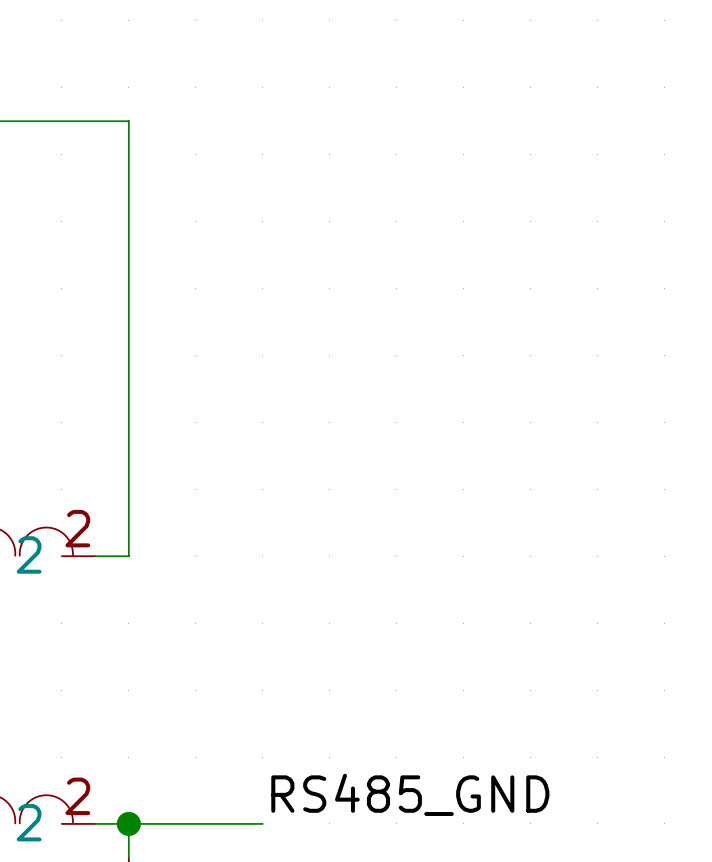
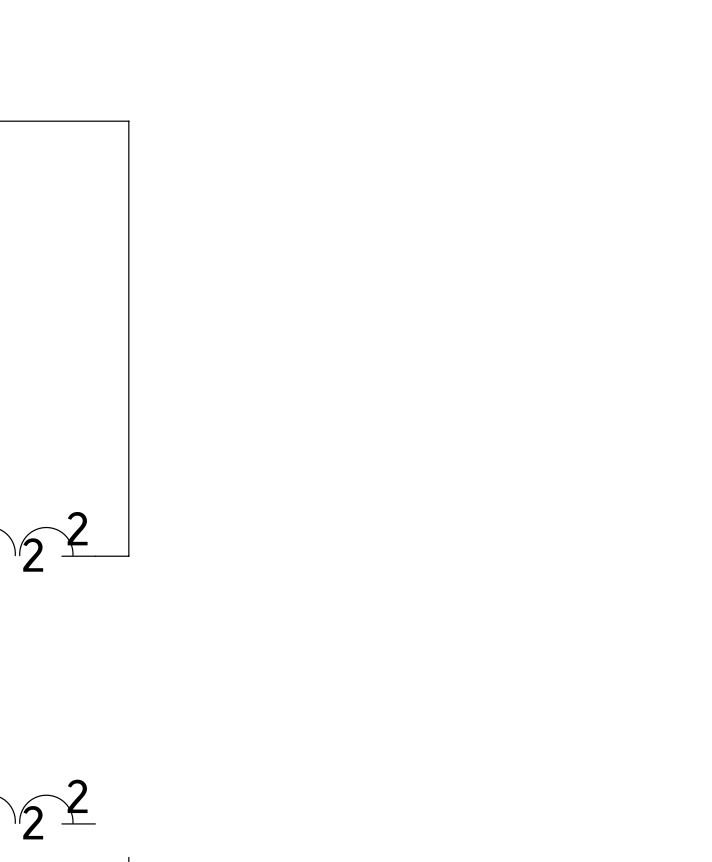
label: RS485_GND (410, 794) -> none
wire: (95, 823) (262, 823) -> none
wire: (128, 823) (128, 857) -> none
junction: (128, 823) -> none

